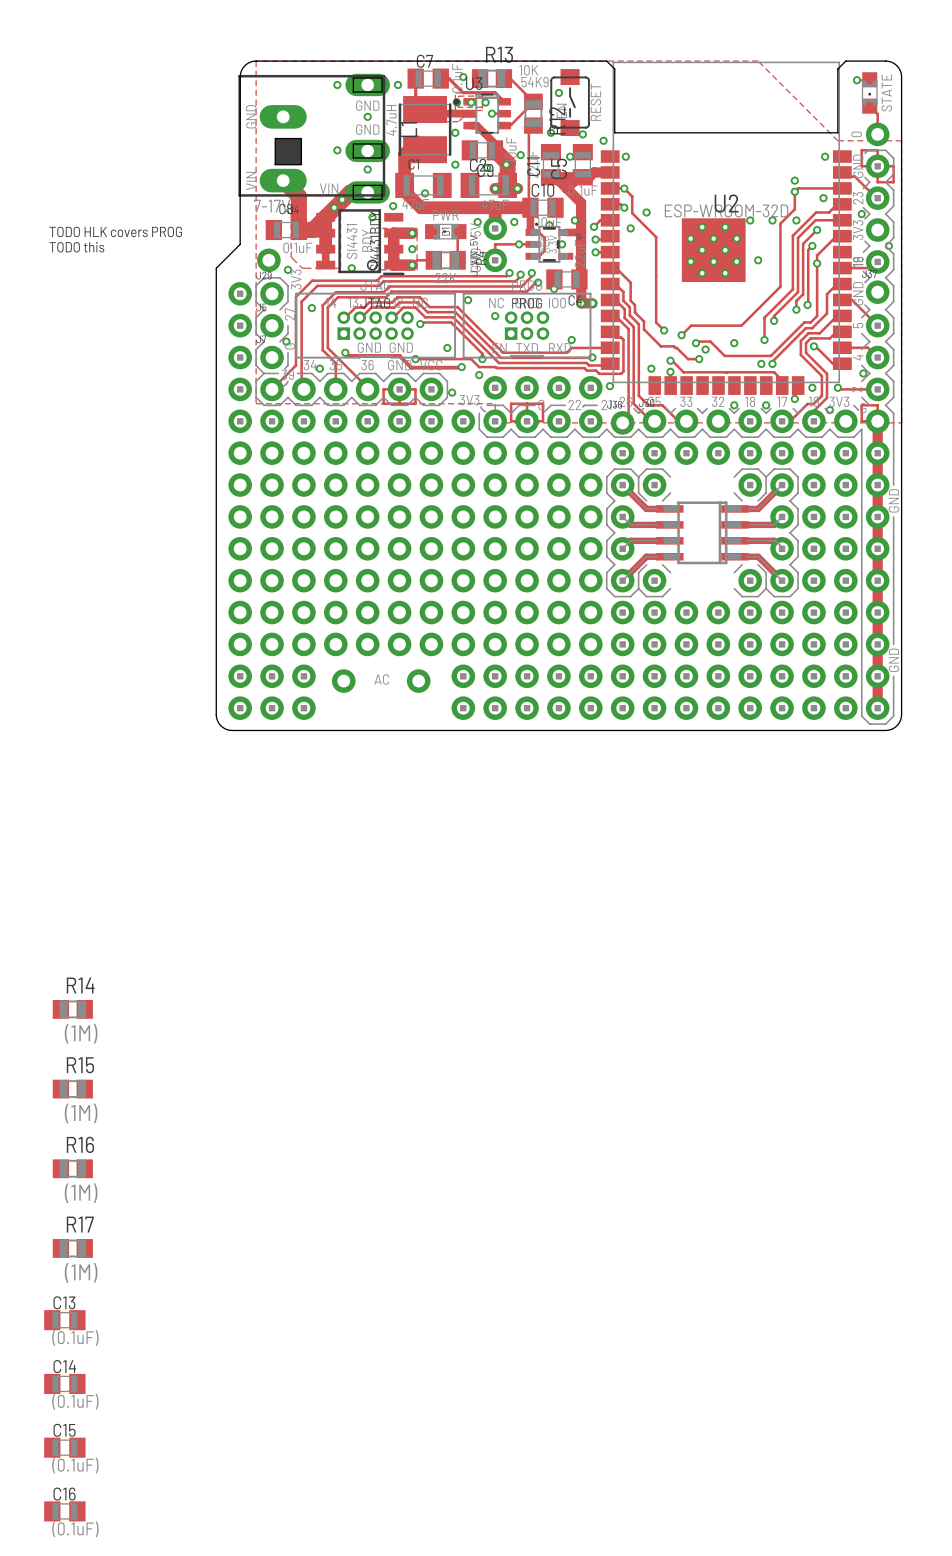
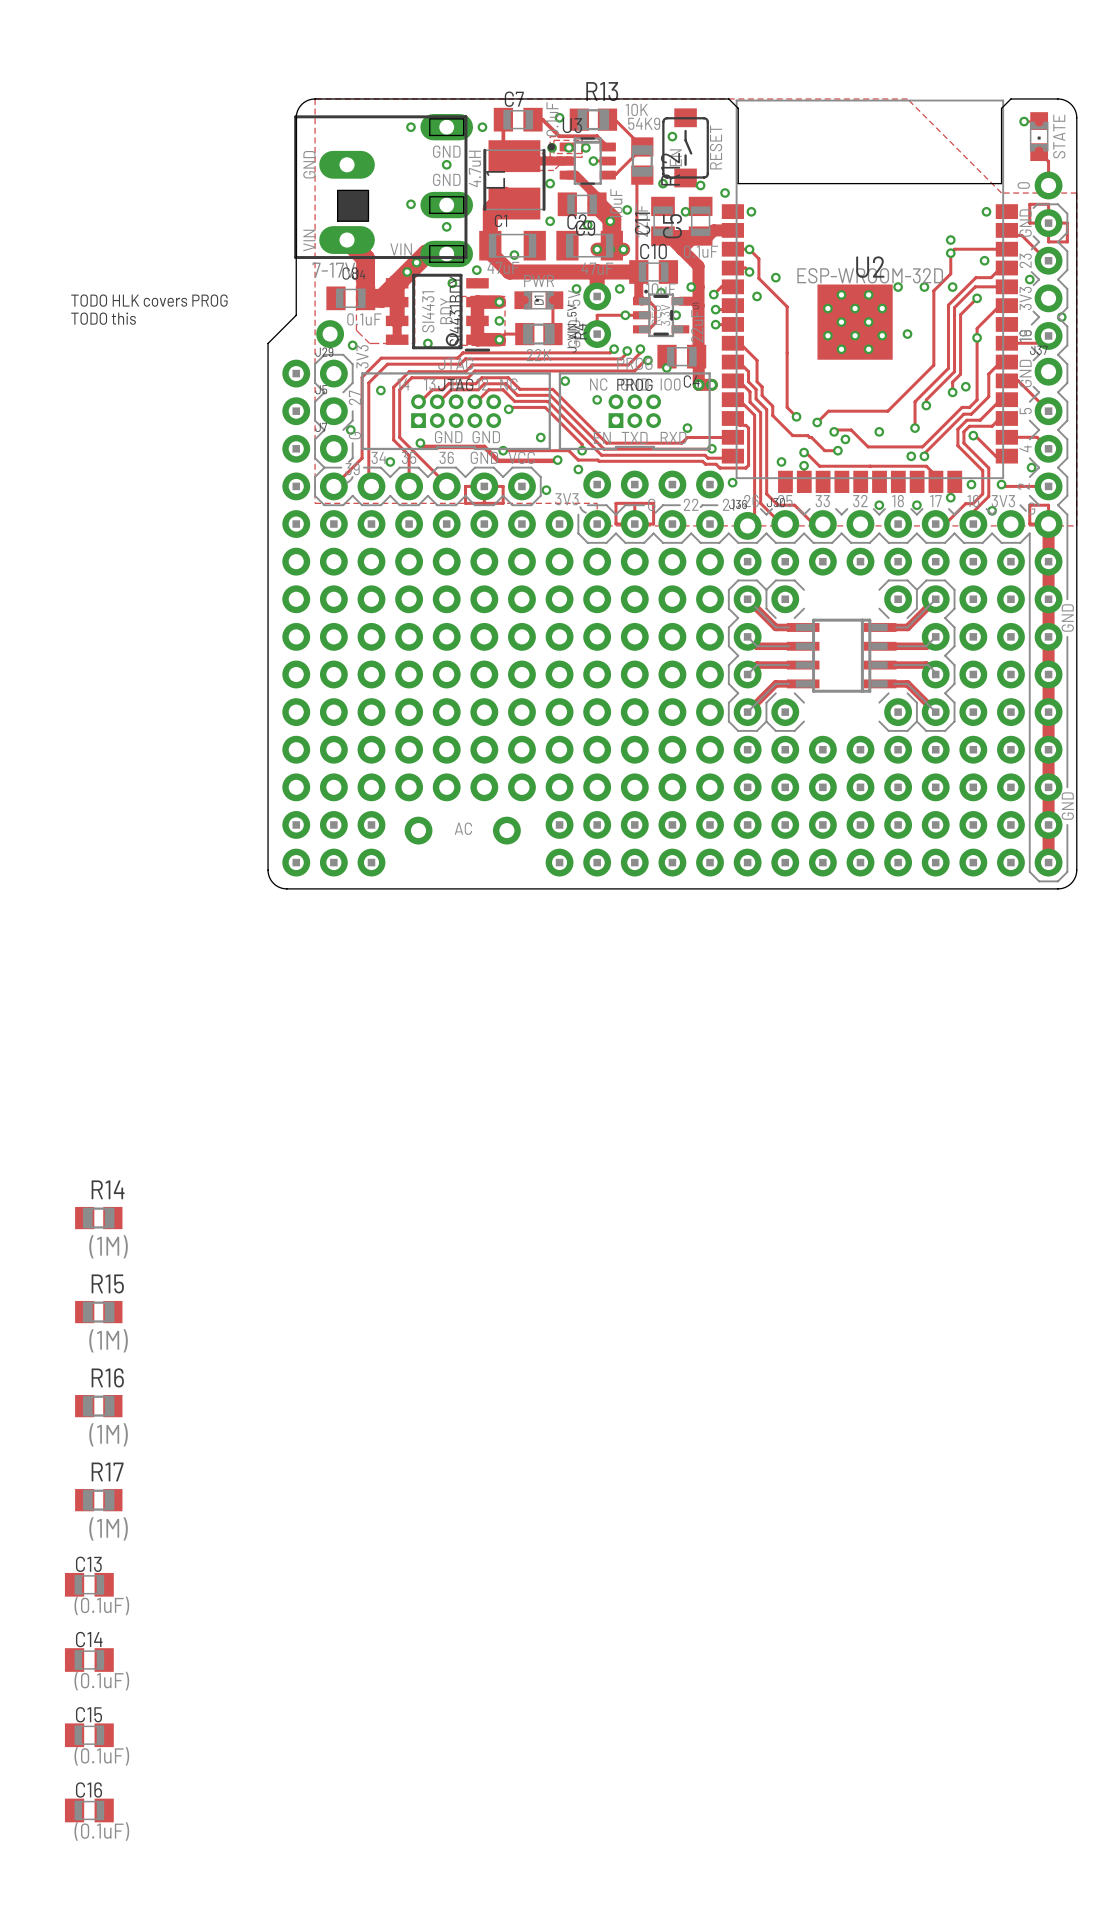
track: (812, 245) (808, 250) (807, 304) -> none
via: (812, 245) -> none

